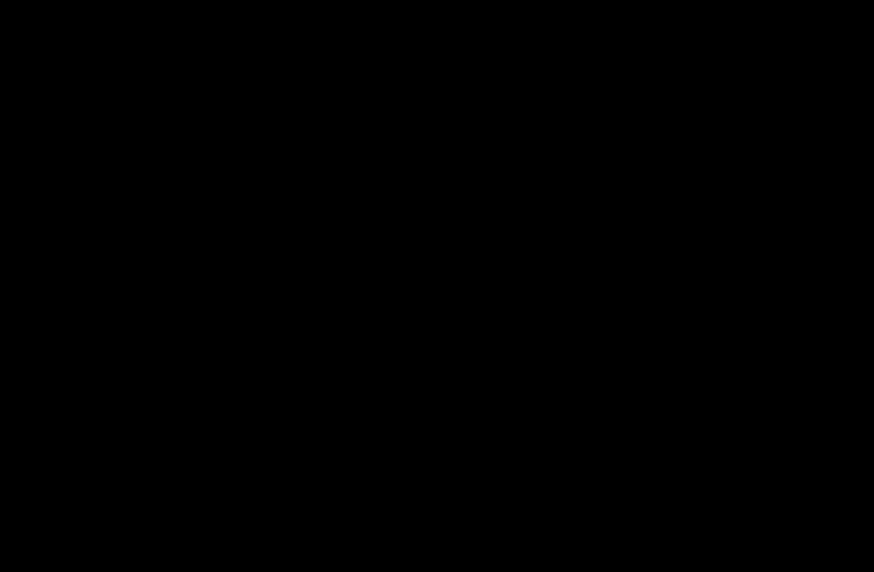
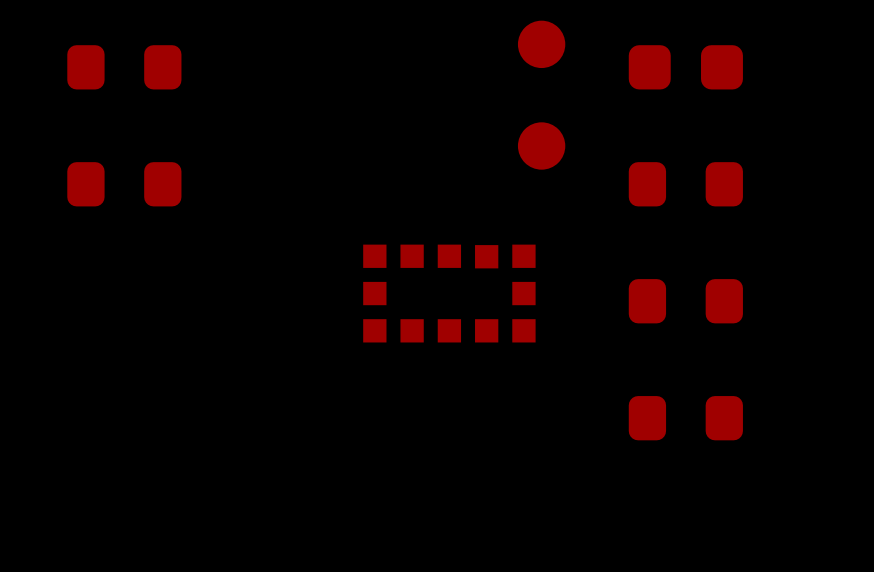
part: none -> (541, 44)
part: none -> (124, 67)
part: none -> (685, 67)
part: none -> (541, 145)
part: none -> (124, 184)
part: none -> (685, 184)
part: none -> (449, 293)
part: none -> (685, 301)
part: none -> (685, 418)

